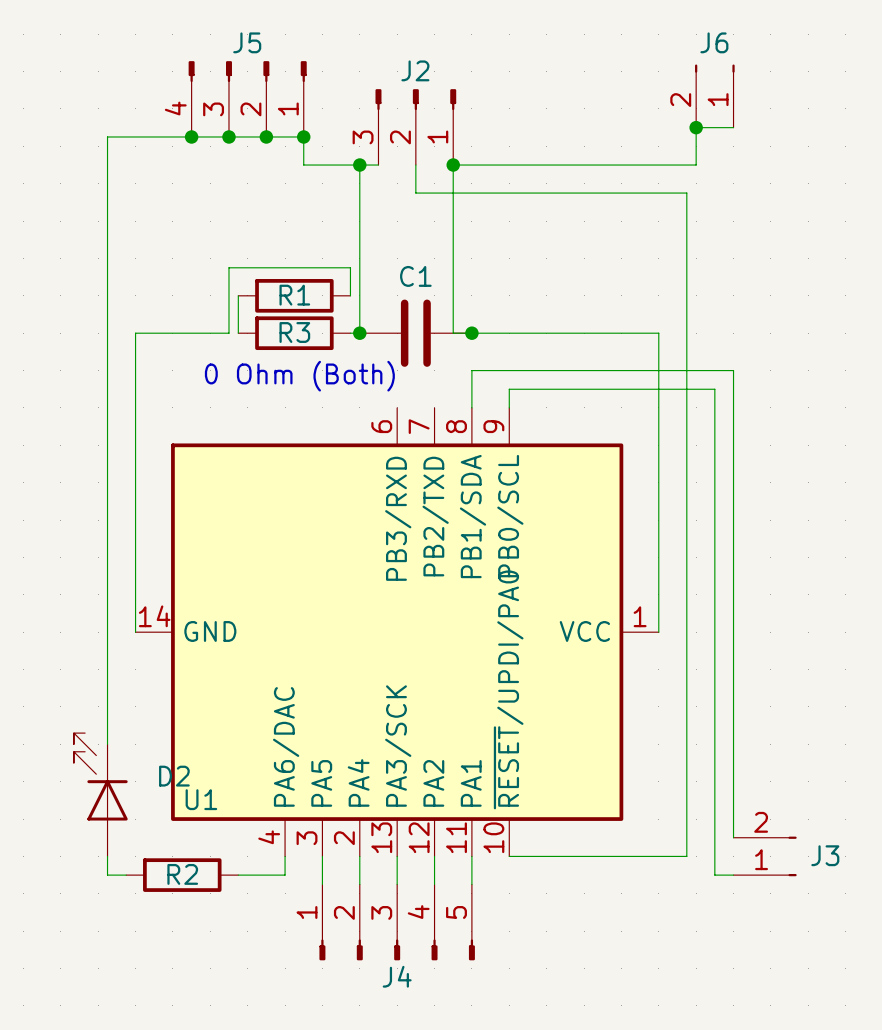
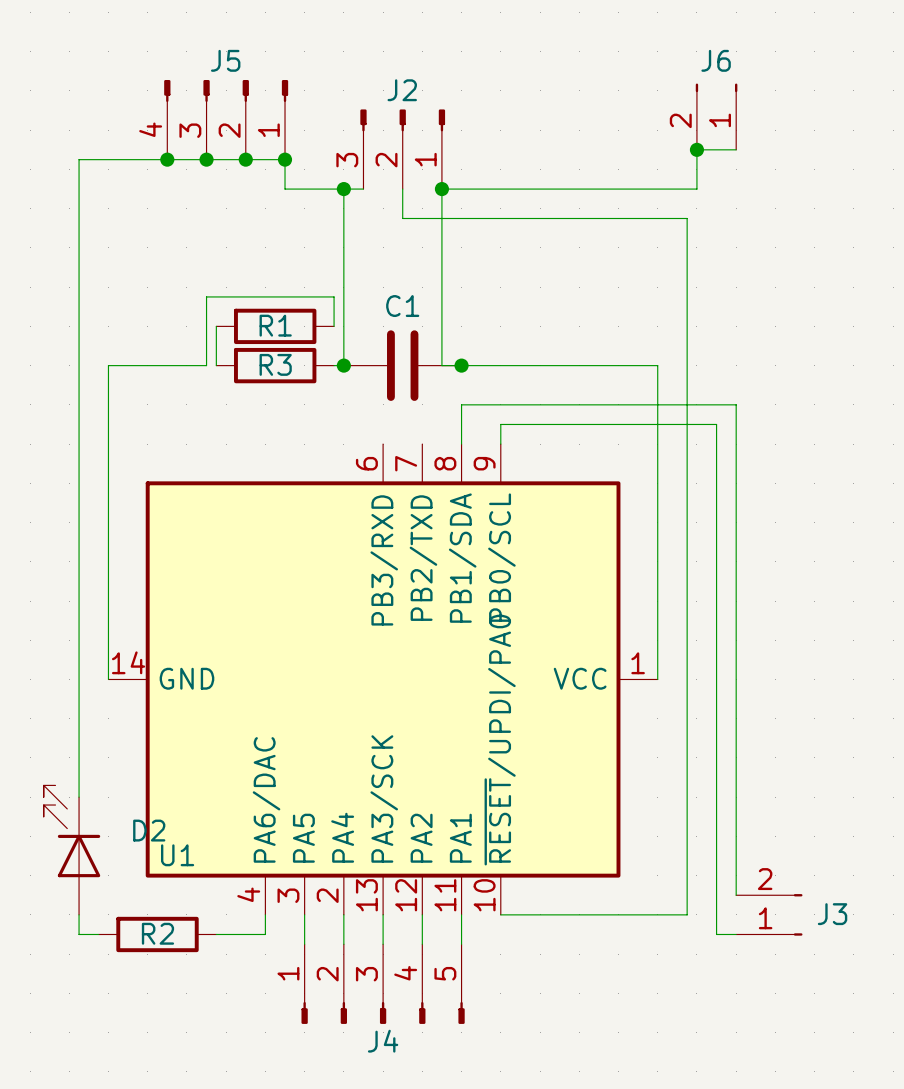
text: 0 Ohm (Both) (299, 376) -> none

